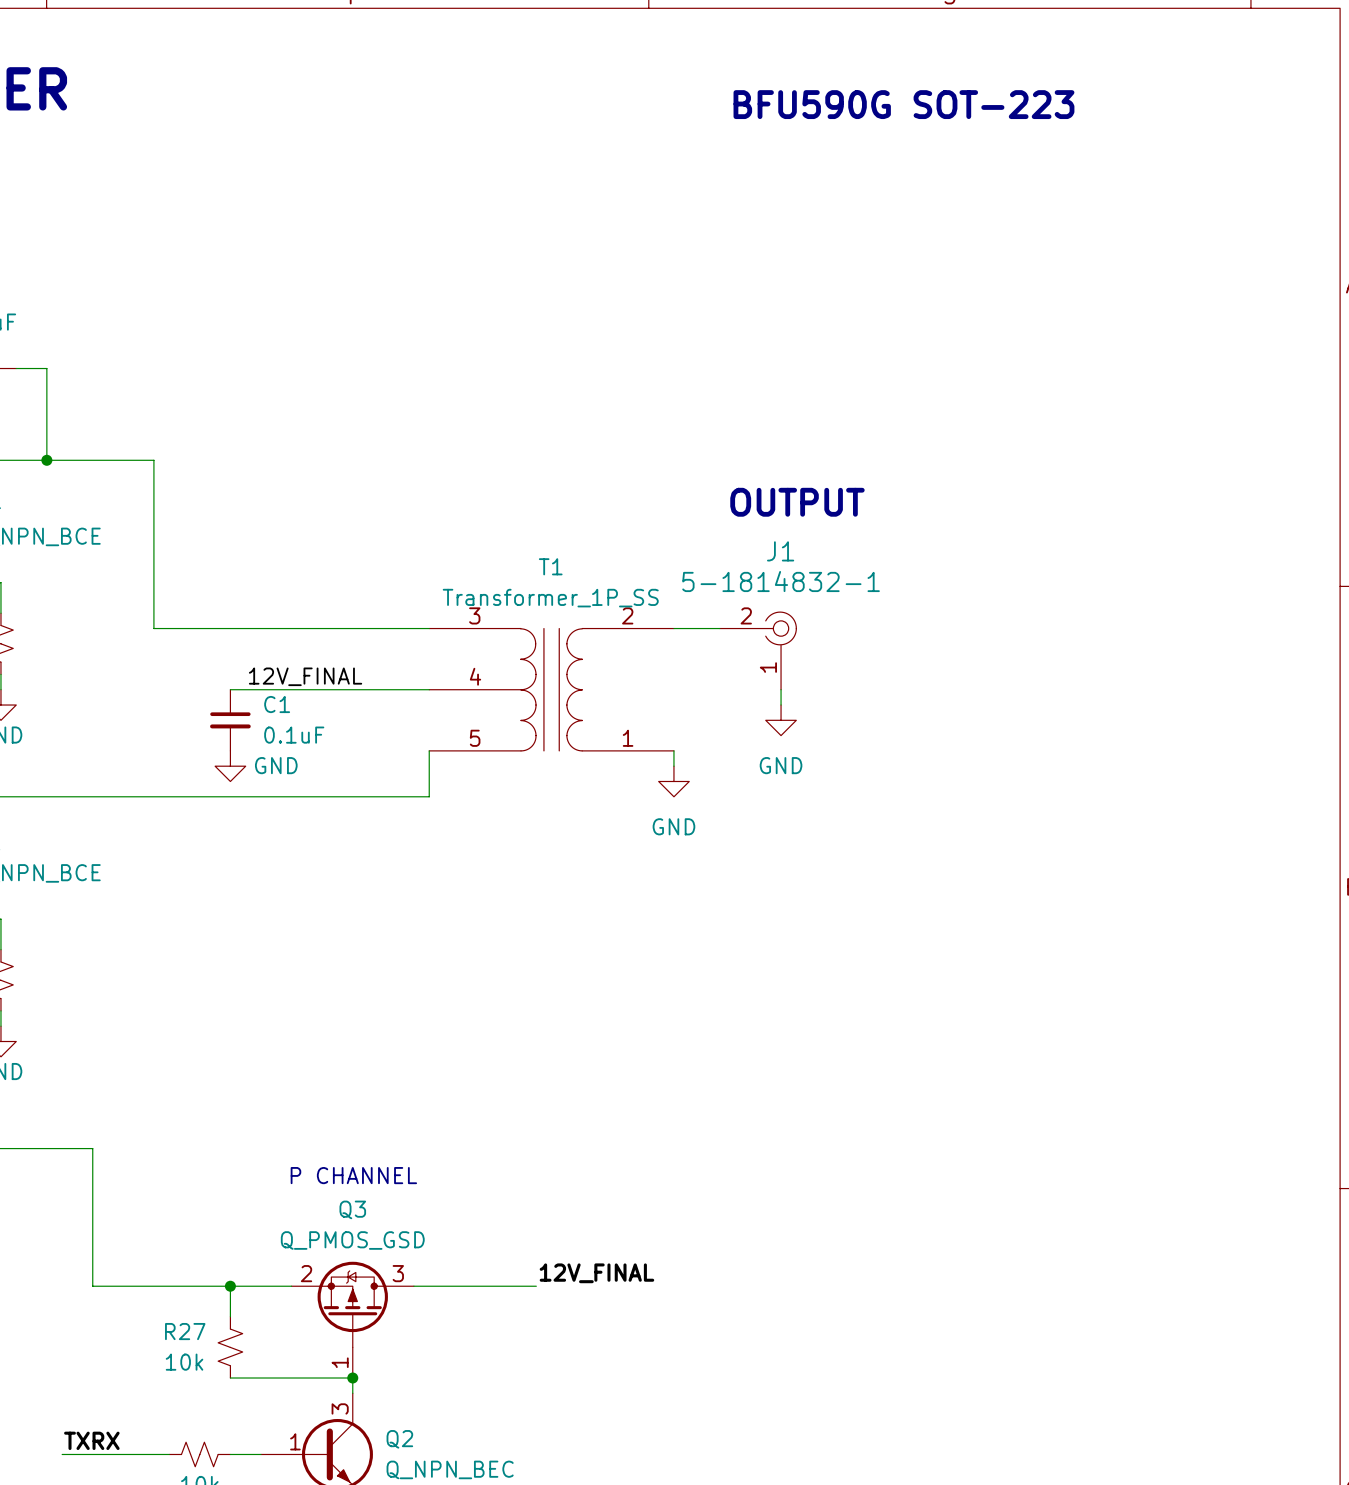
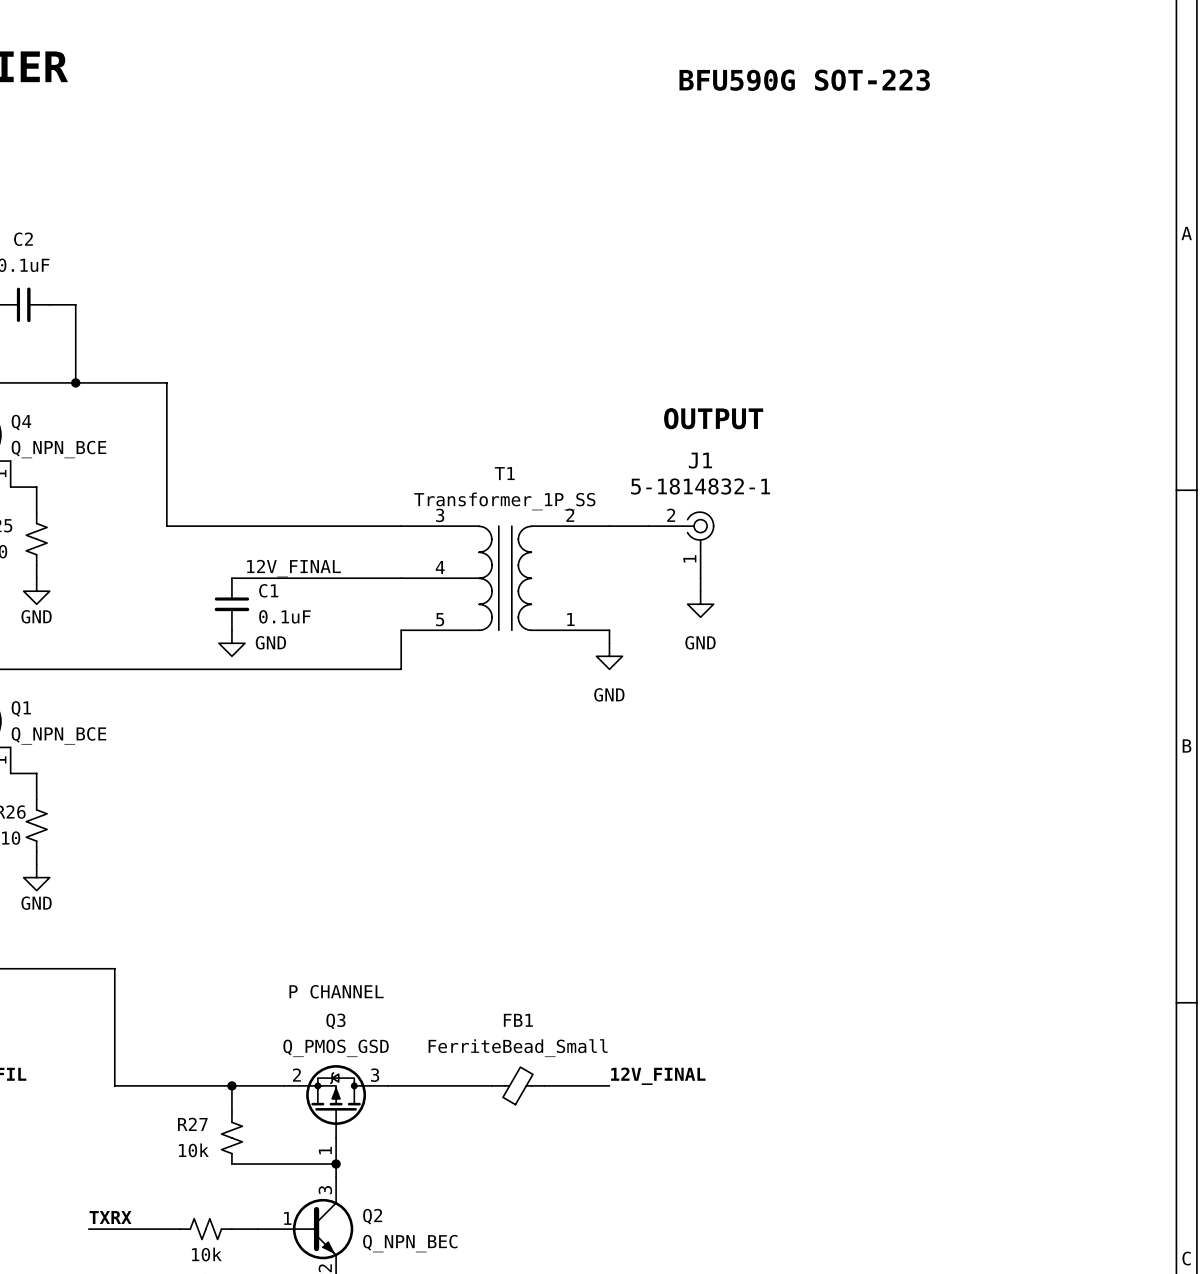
label position: 12V_FINAL (596, 1273) -> 12V_FINAL (658, 1076)
FB1: none -> FerriteBead_Small (518, 1085)
wire: none -> (544, 1085) (609, 1085)

